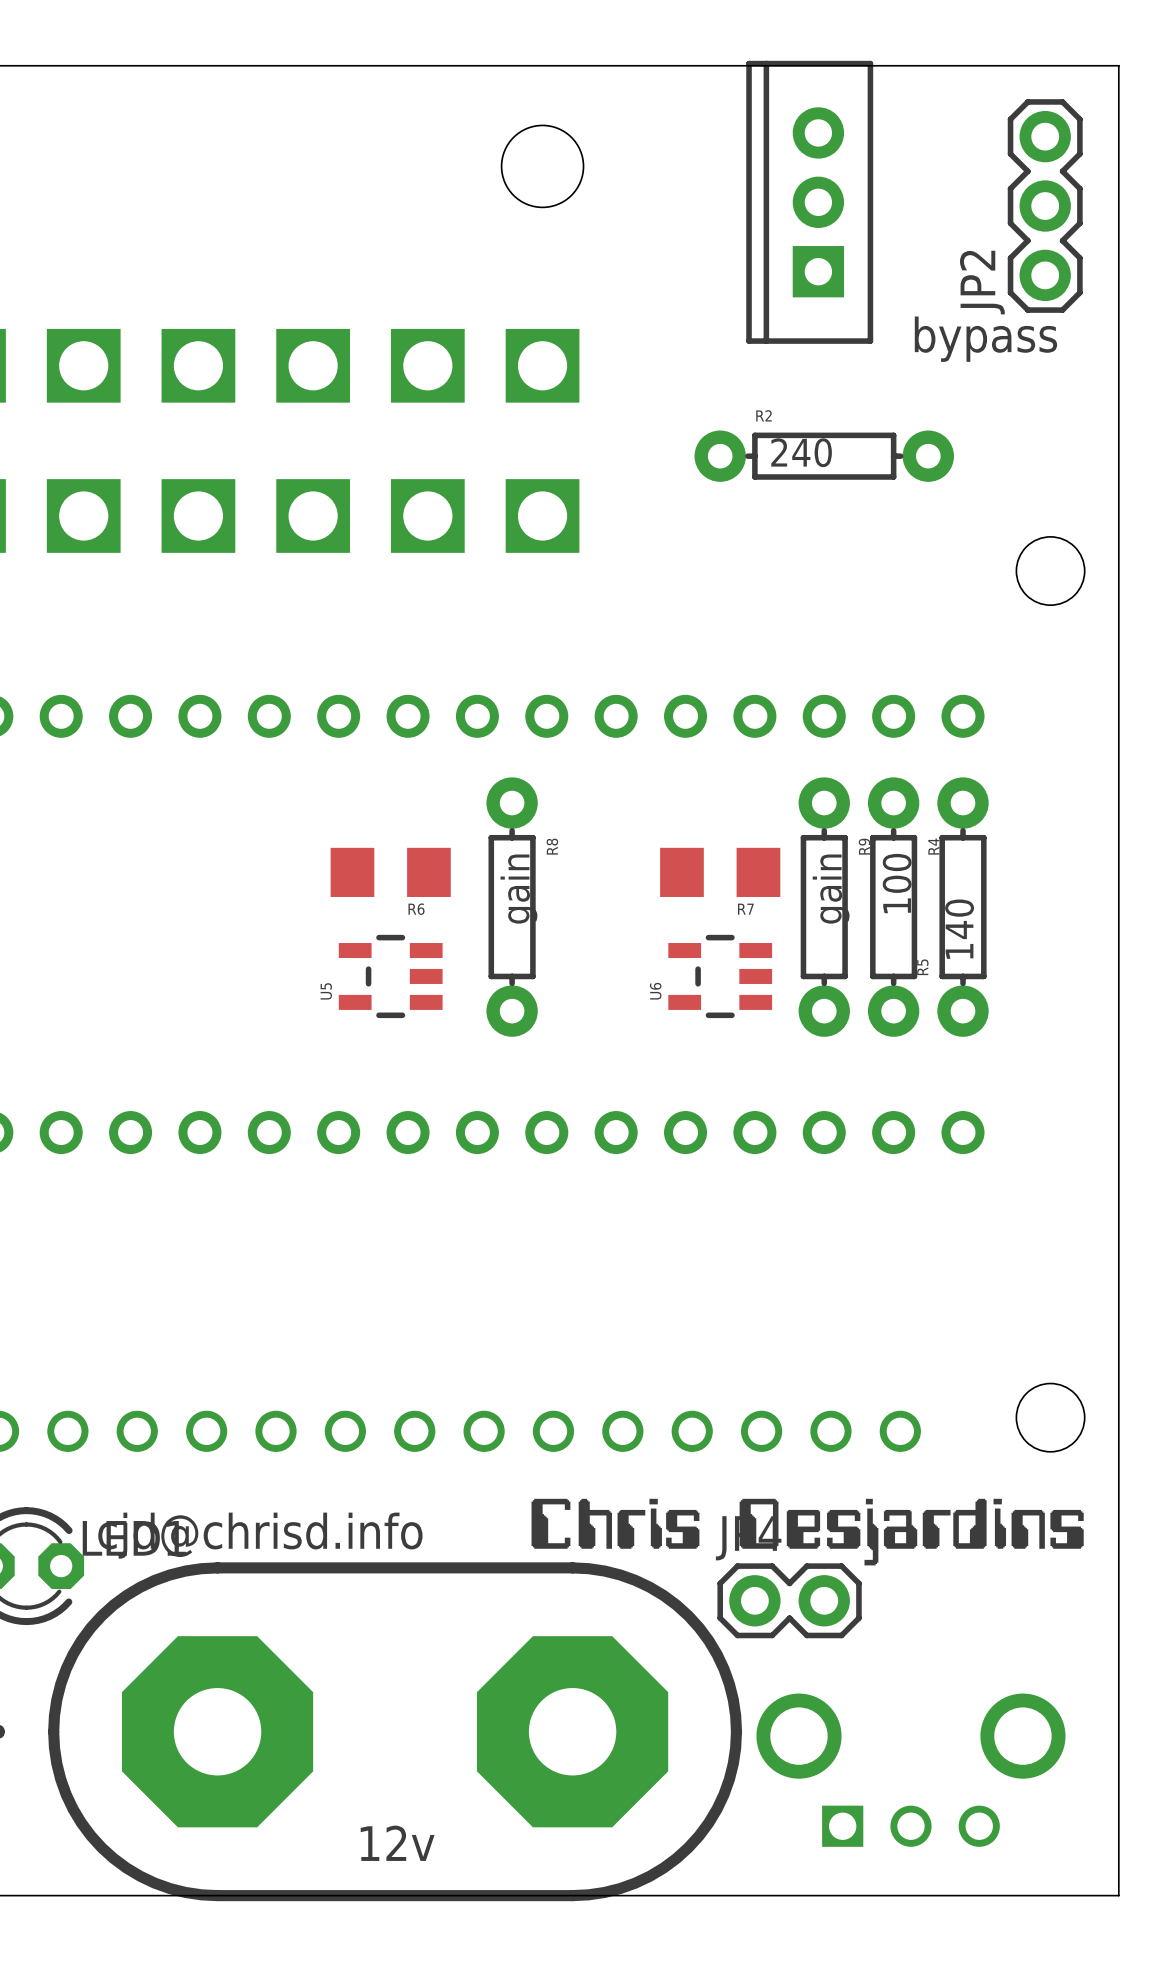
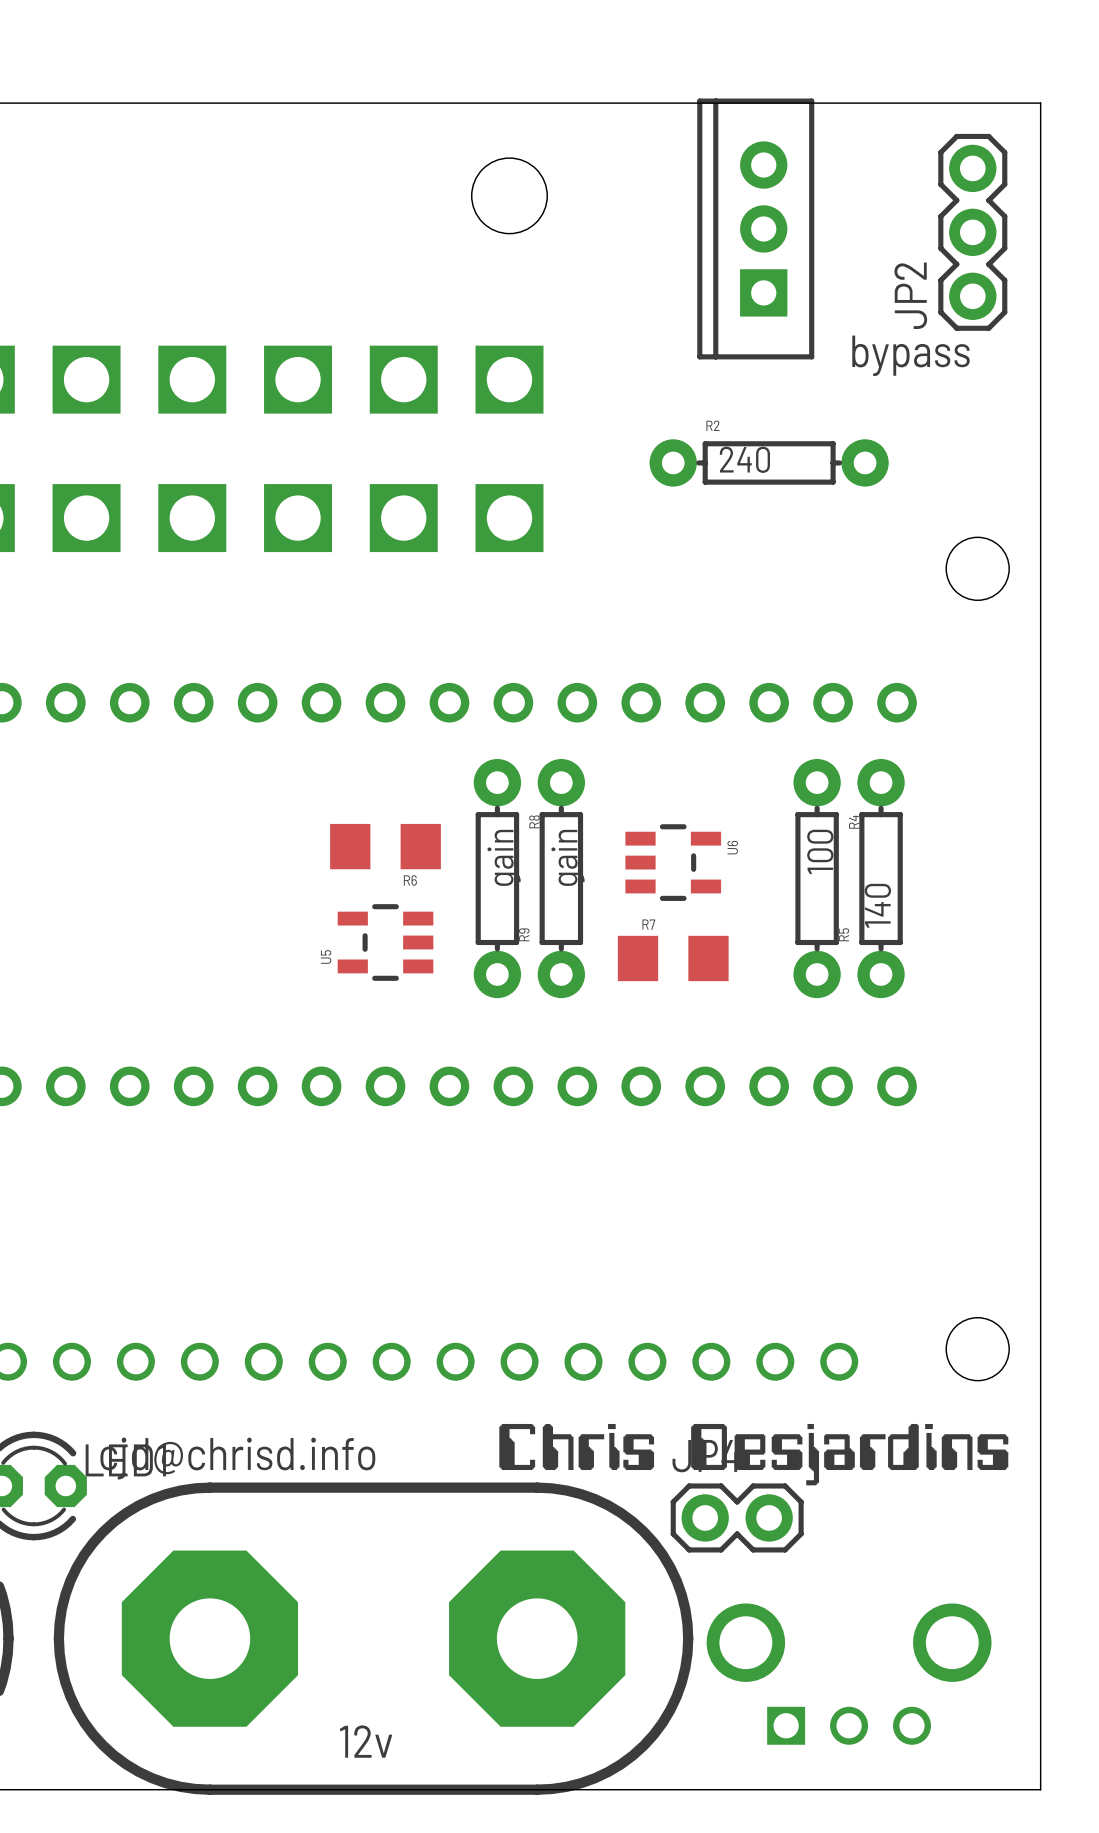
R9 name position: R9 (864, 846) -> R9 (524, 934)
R6 position: (390, 872) -> (385, 846)
R7 position: (720, 872) -> (673, 958)
R8 position: (512, 907) -> (497, 878)
R9 position: (824, 907) -> (561, 878)
R4 position: (893, 907) -> (817, 878)
R5 position: (963, 907) -> (881, 878)
R7 name position: R7 (745, 909) -> R7 (648, 924)
U5 position: (390, 976) -> (385, 942)
U6 rotation: 0° (720, 976) -> 180° (673, 862)
U6 position: (720, 976) -> (673, 862)

